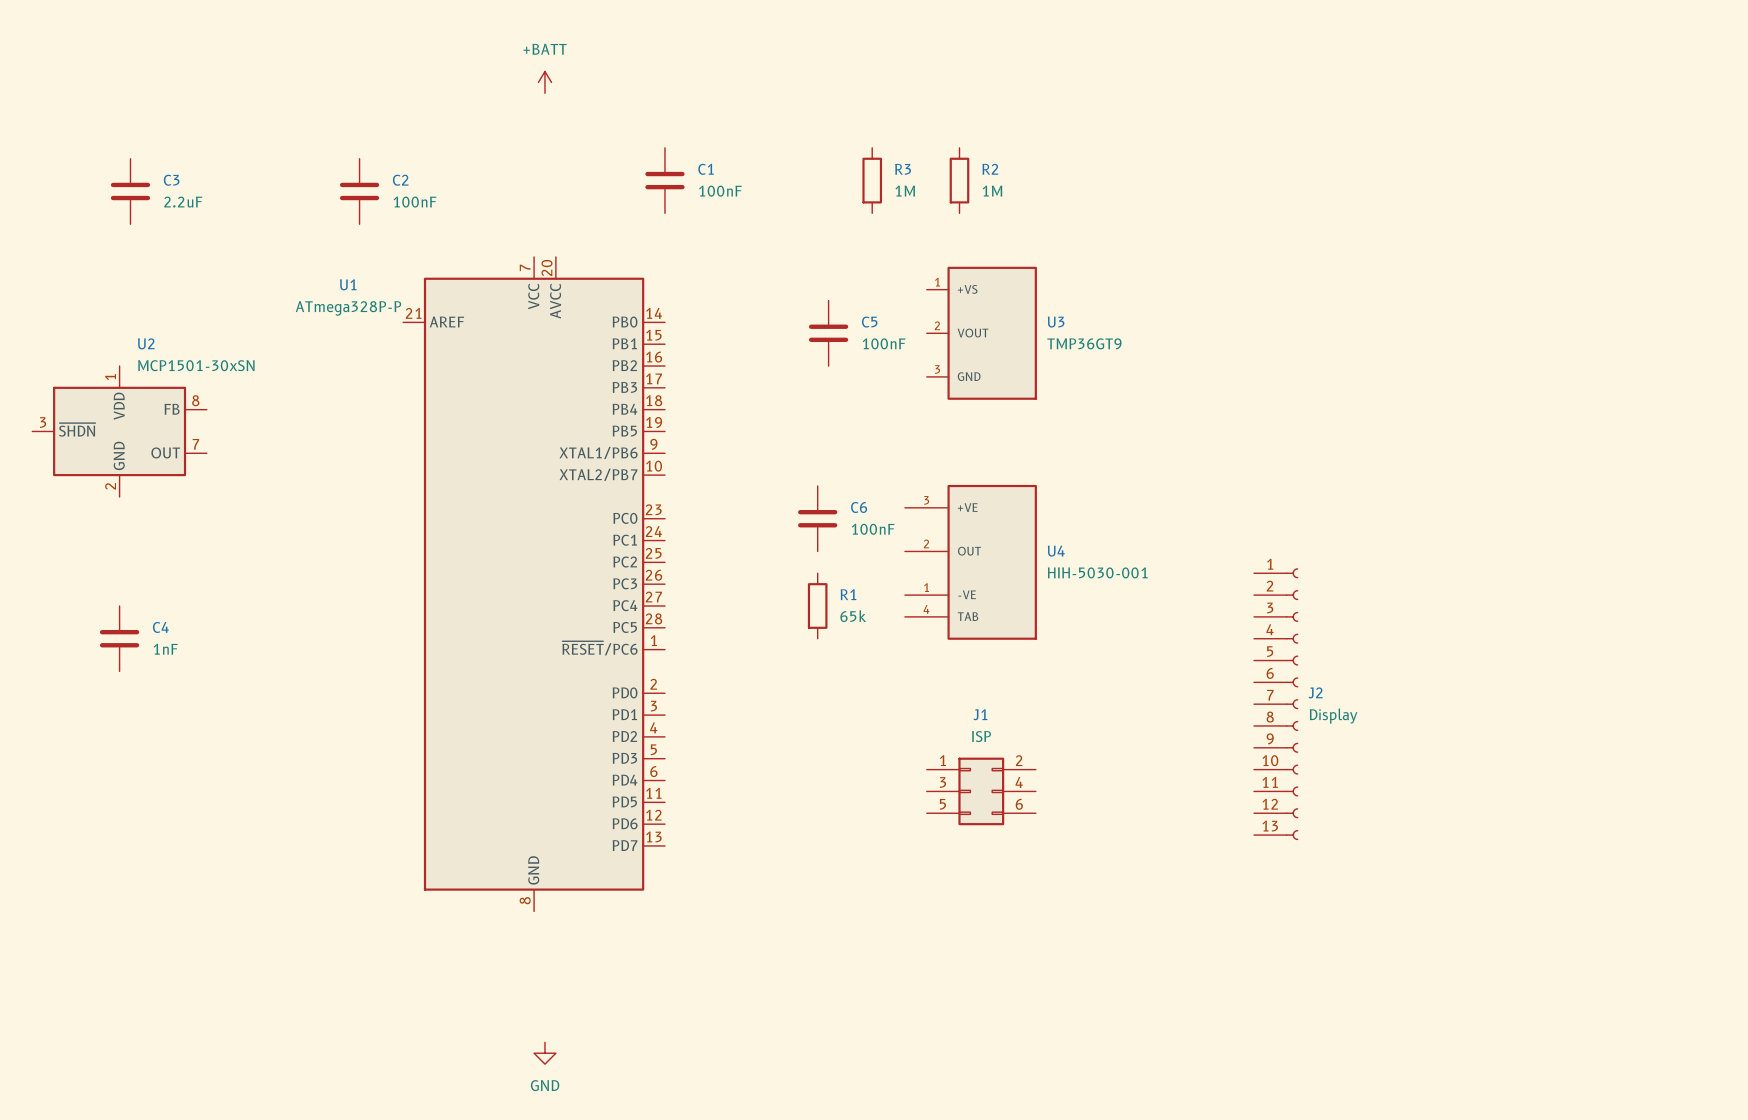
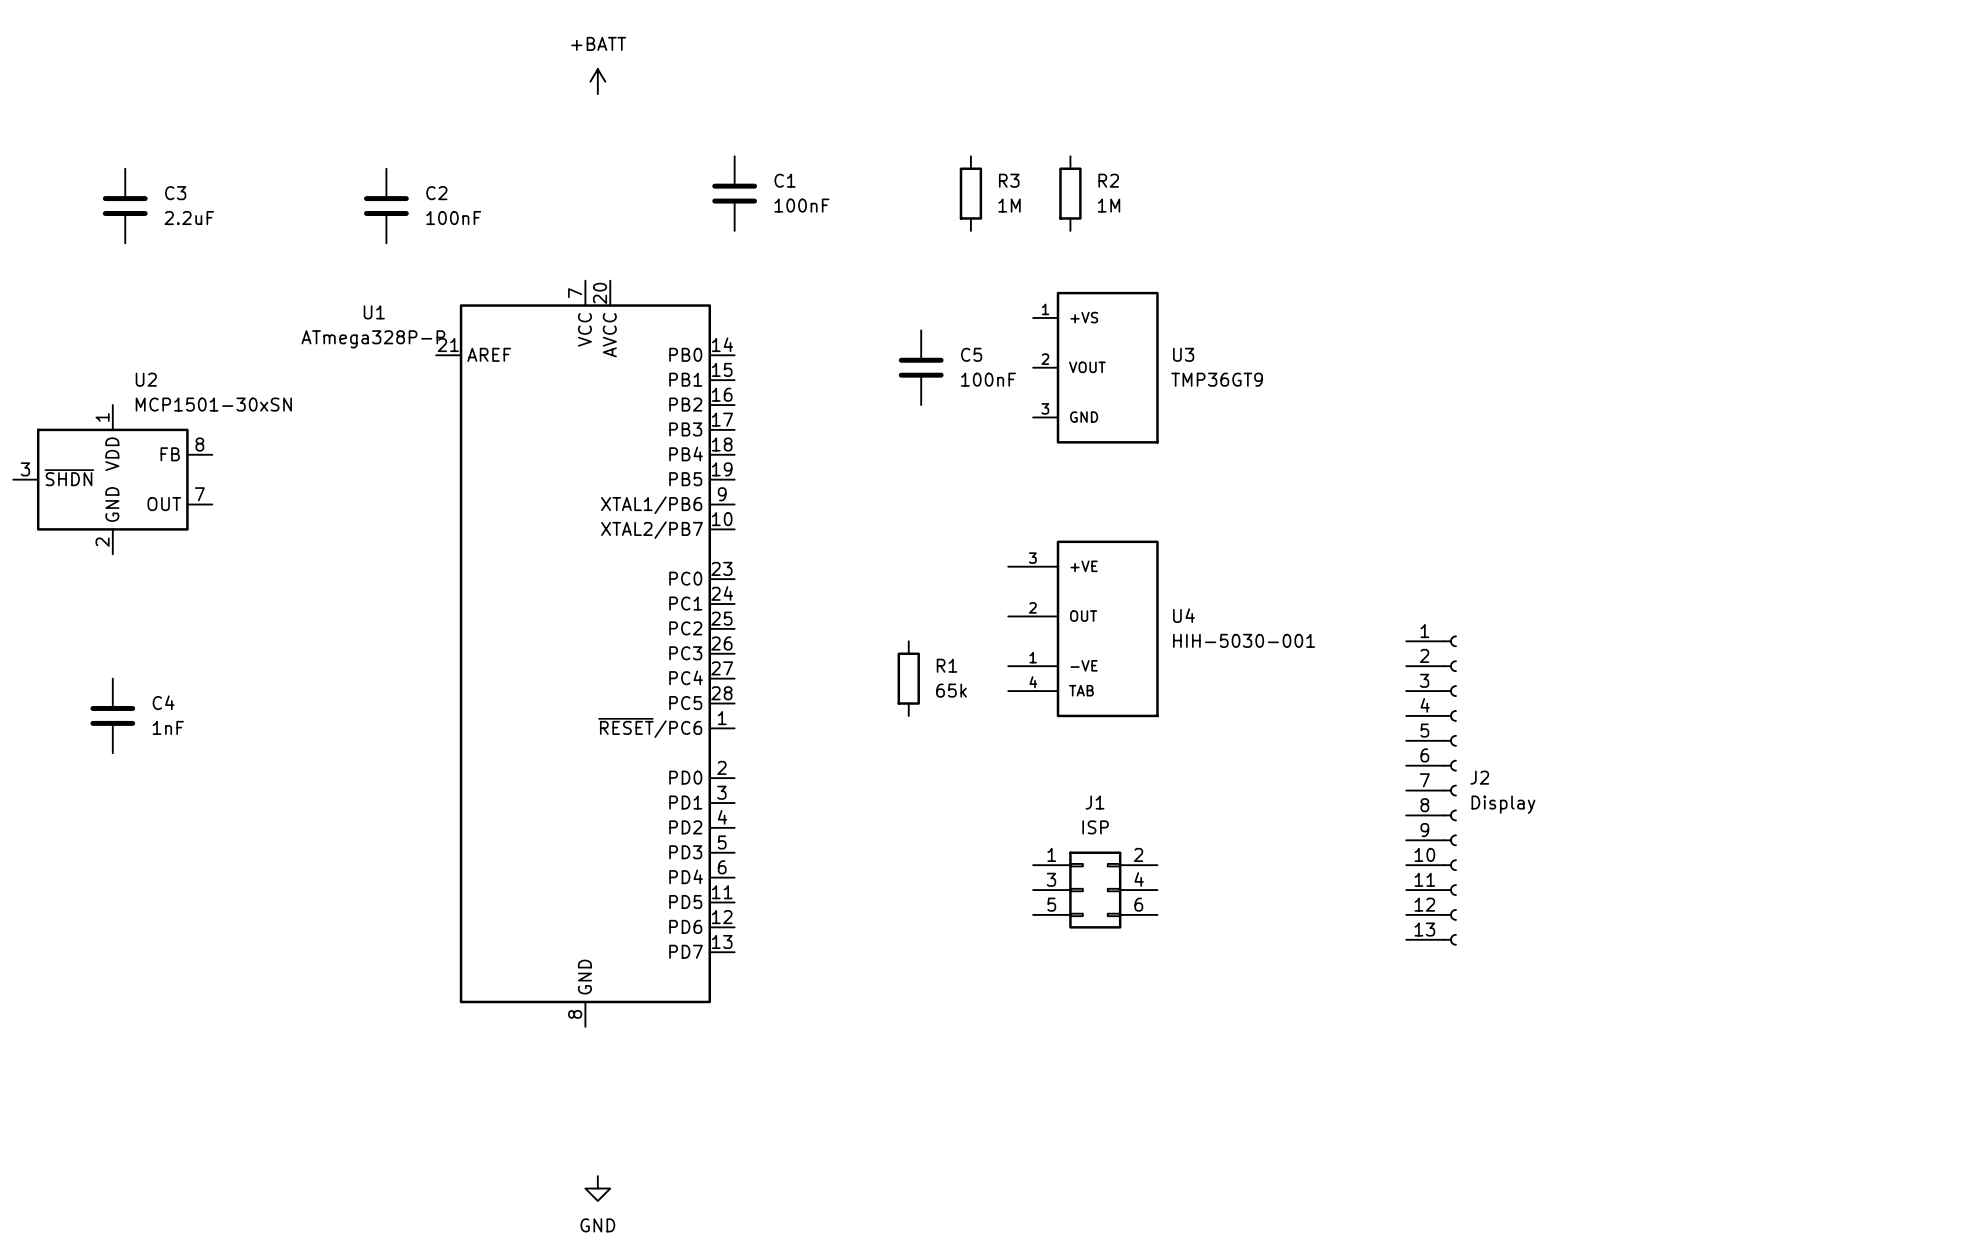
C6: 100nF (817, 518) -> none

